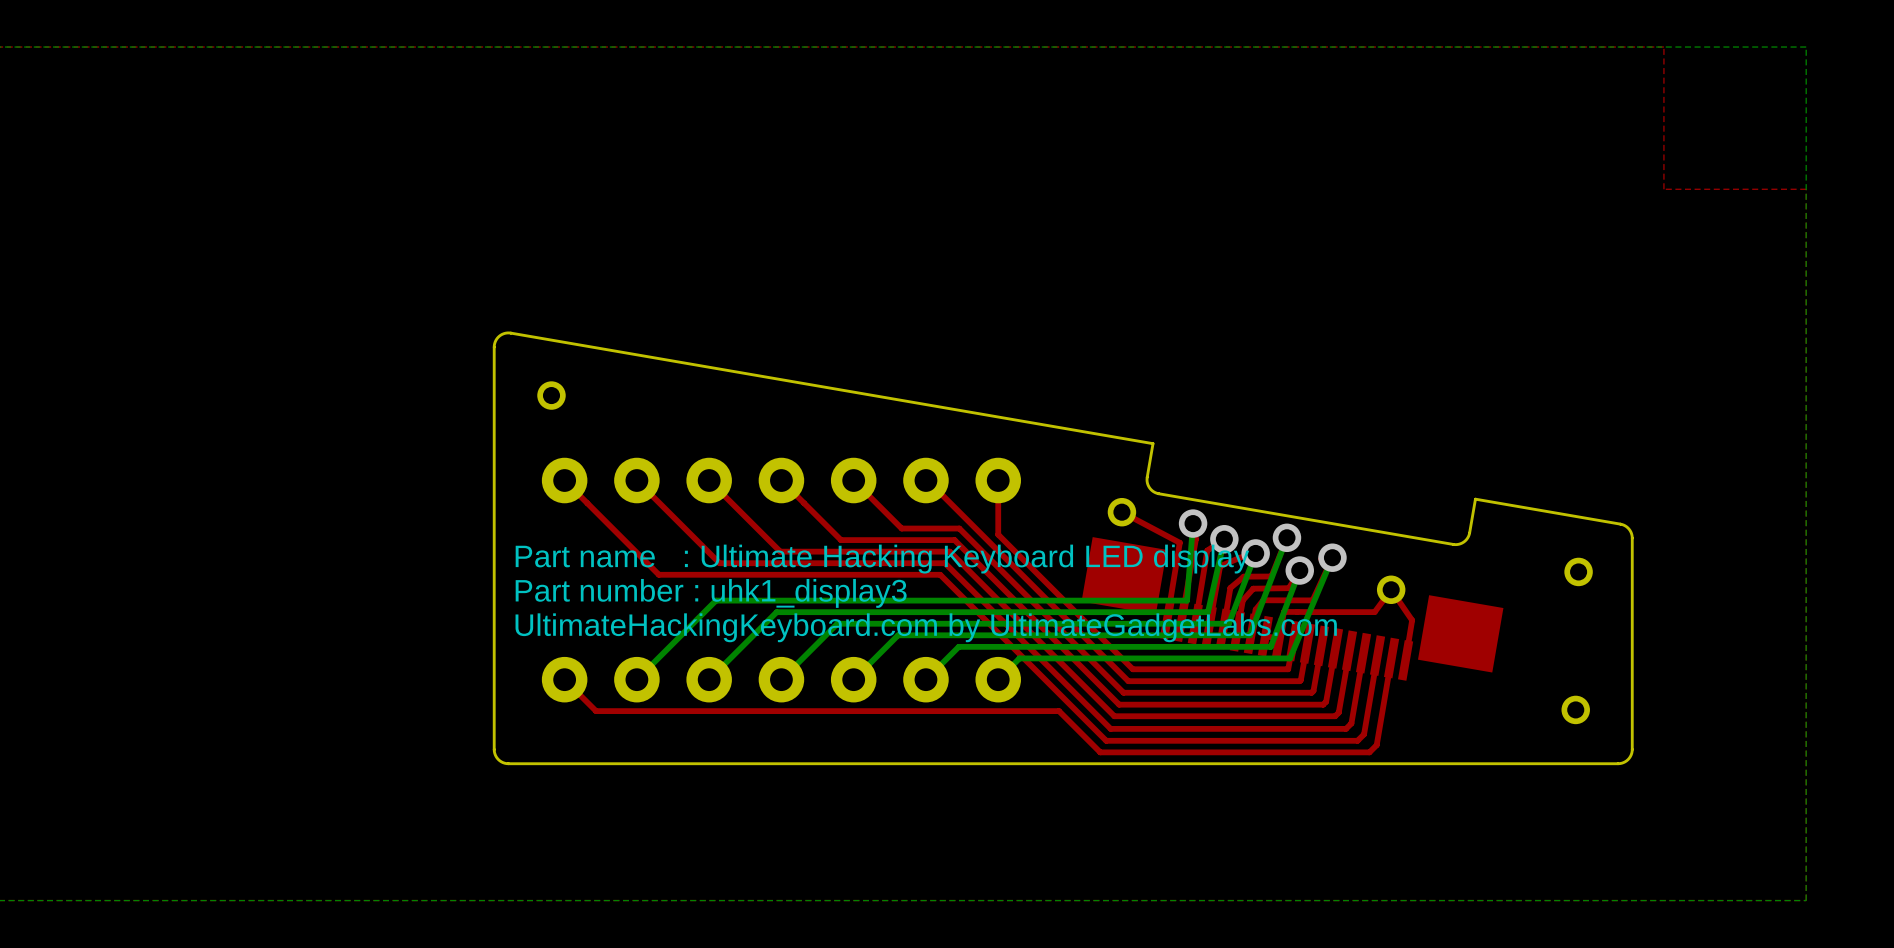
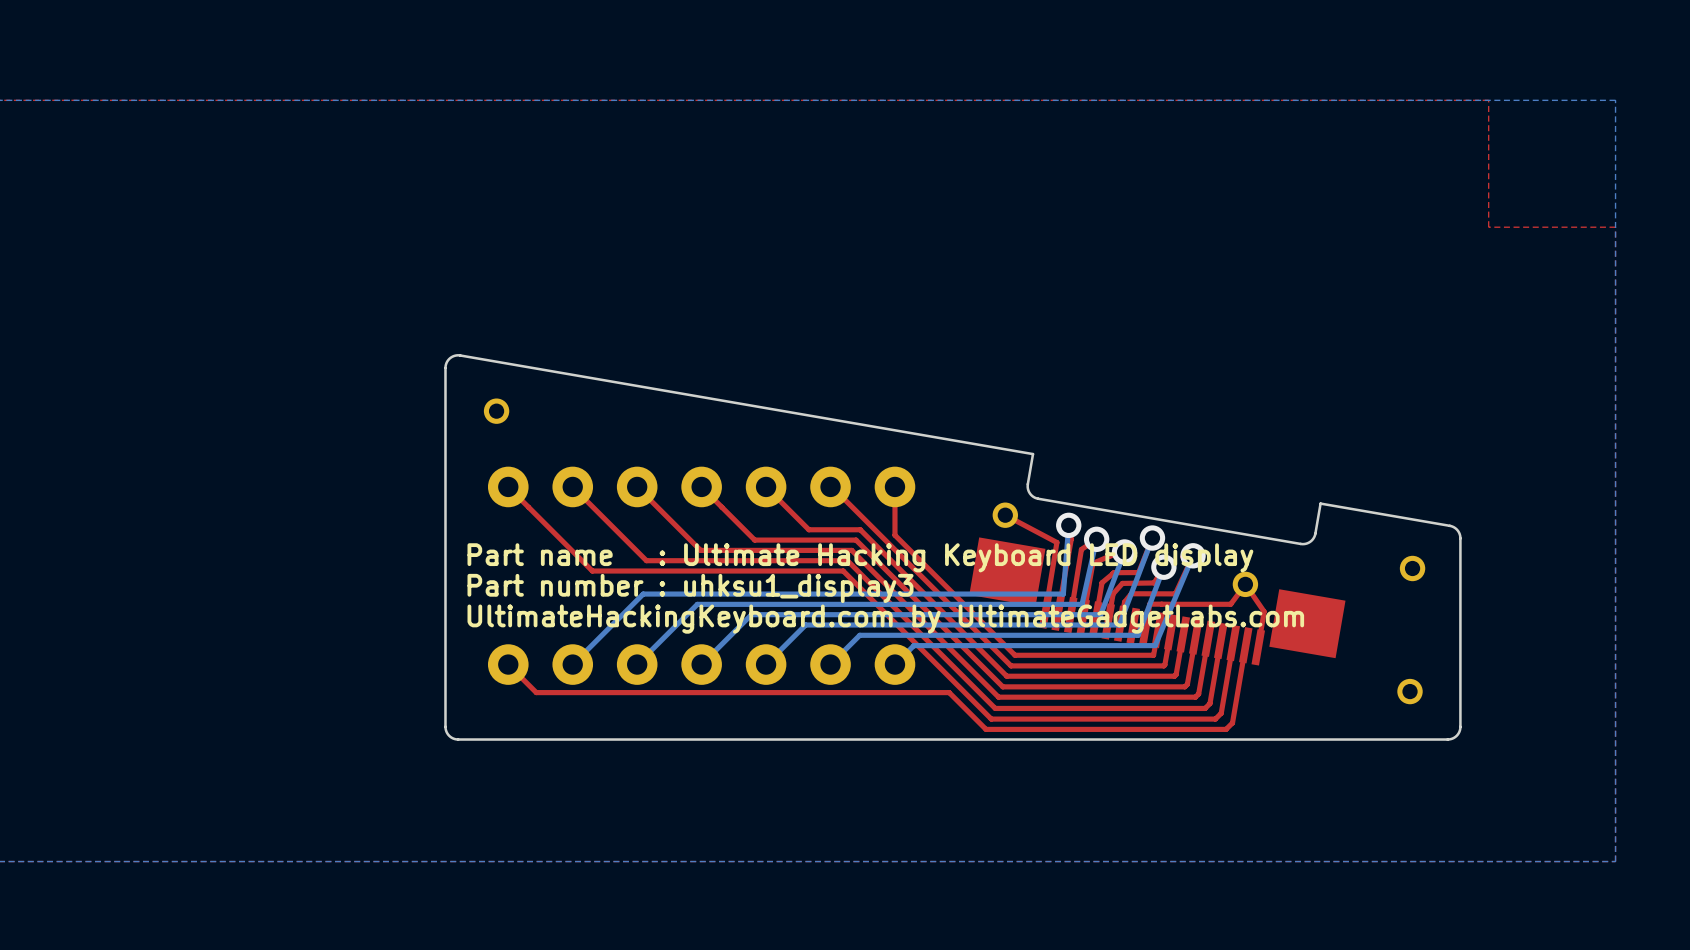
text: Part number : uhk1_display3 (711, 593) -> Part number : uhksu1_display3 (690, 588)

